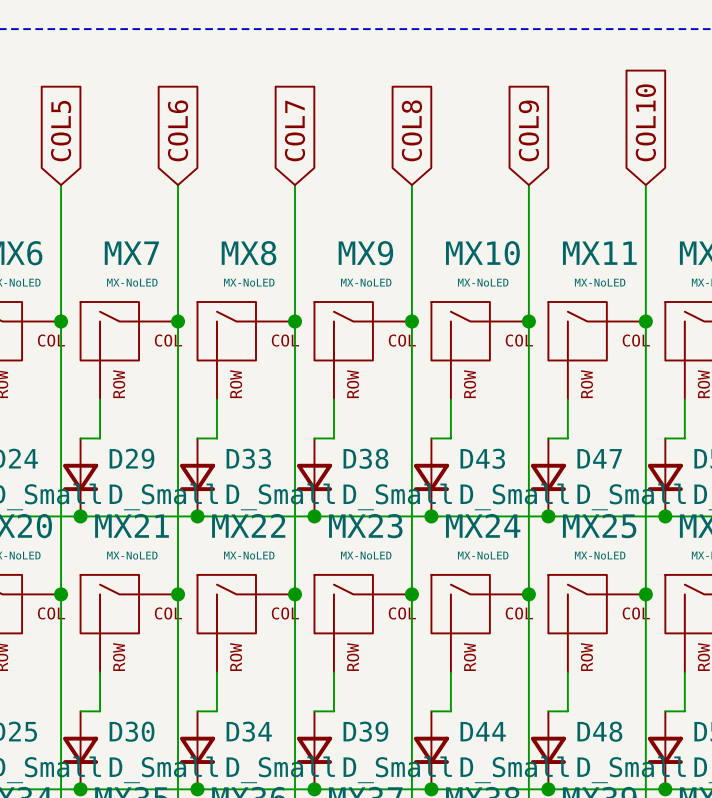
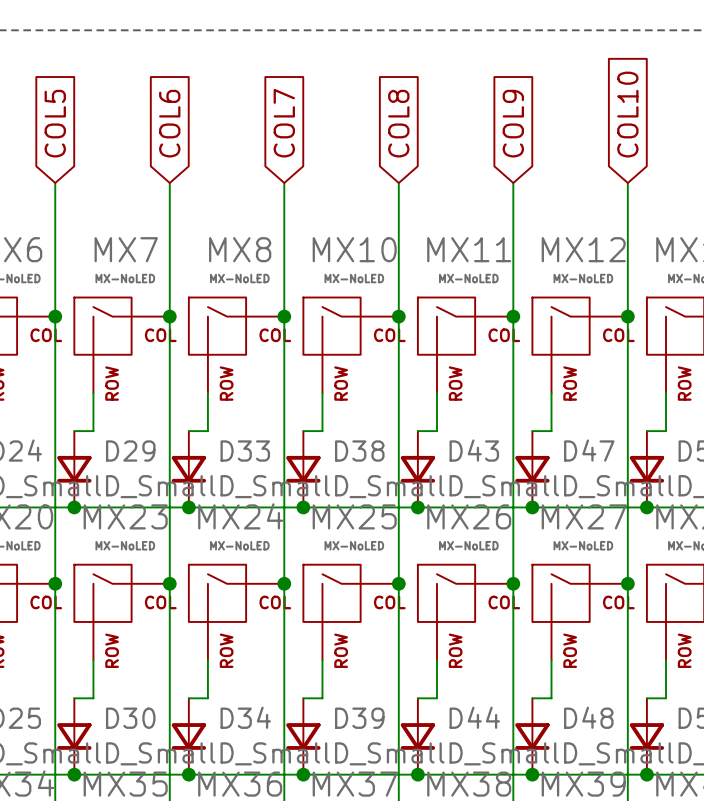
MX9 name: MX9 (365, 253) -> MX10 (354, 249)
MX10 name: MX10 (482, 253) -> MX11 (469, 249)
MX11 name: MX11 (599, 253) -> MX12 (583, 249)
MX21 name: MX21 (131, 525) -> MX23 (125, 516)
MX22 name: MX22 (248, 525) -> MX24 (240, 516)
MX24 name: MX24 (483, 525) -> MX26 (469, 516)
MX23 name: MX23 (365, 526) -> MX25 (354, 516)
MX25 name: MX25 (599, 526) -> MX27 (584, 516)

